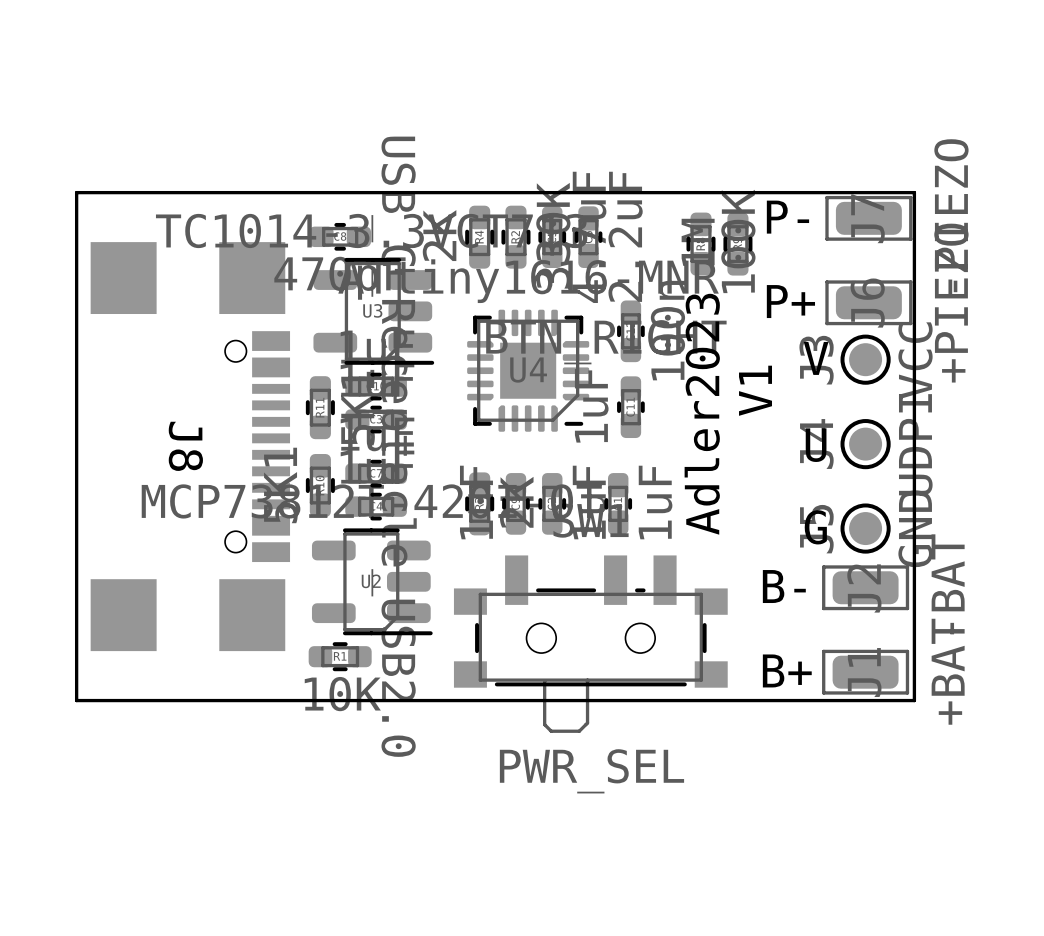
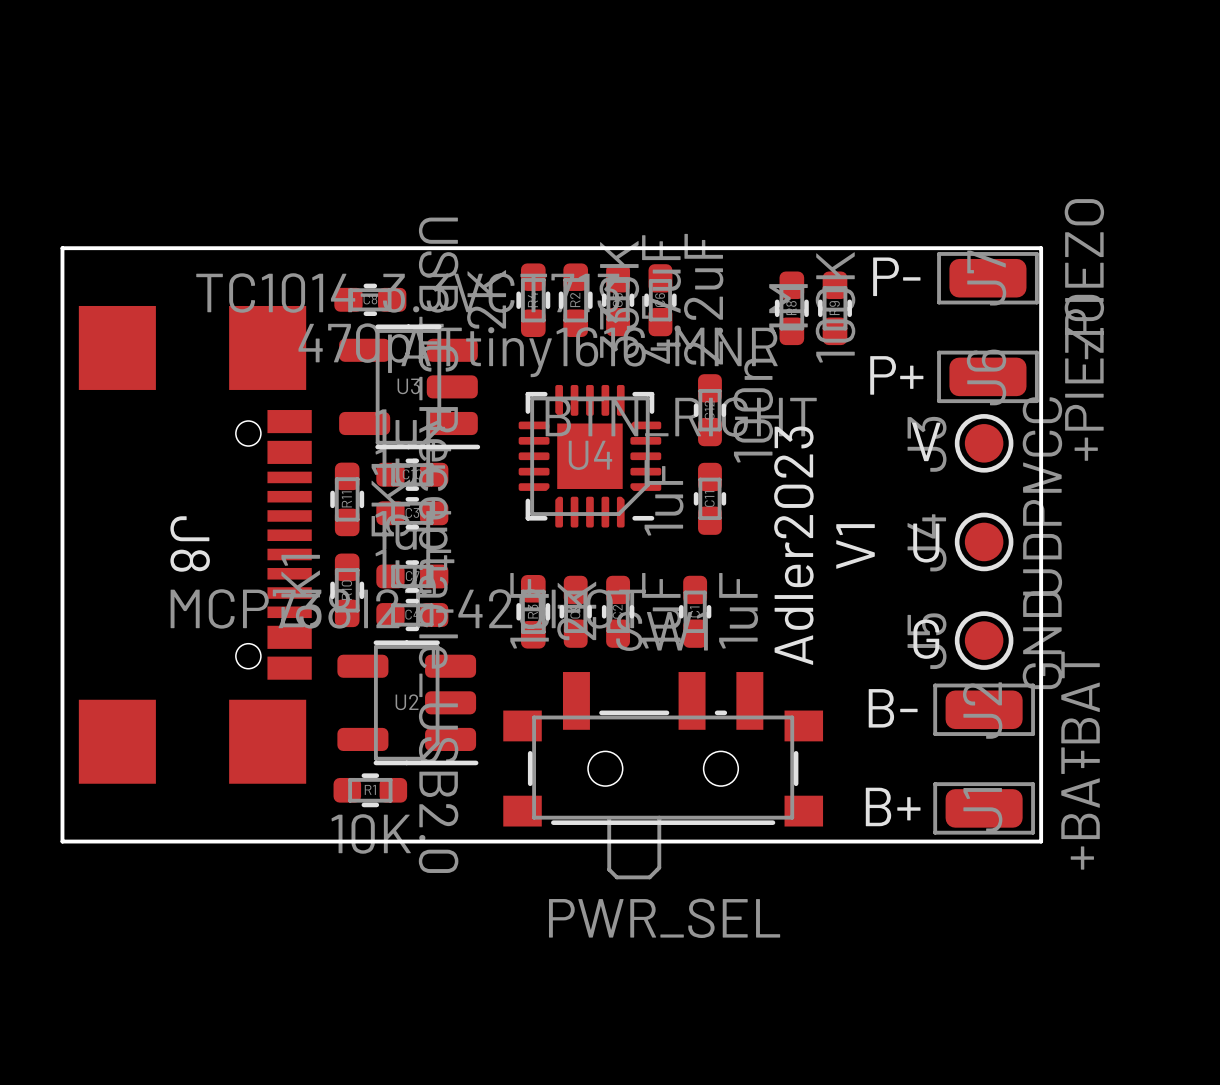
text position: V1 (755, 390) -> V1 (855, 546)
text position: Adler2023 (702, 414) -> Adler2023 (793, 545)

